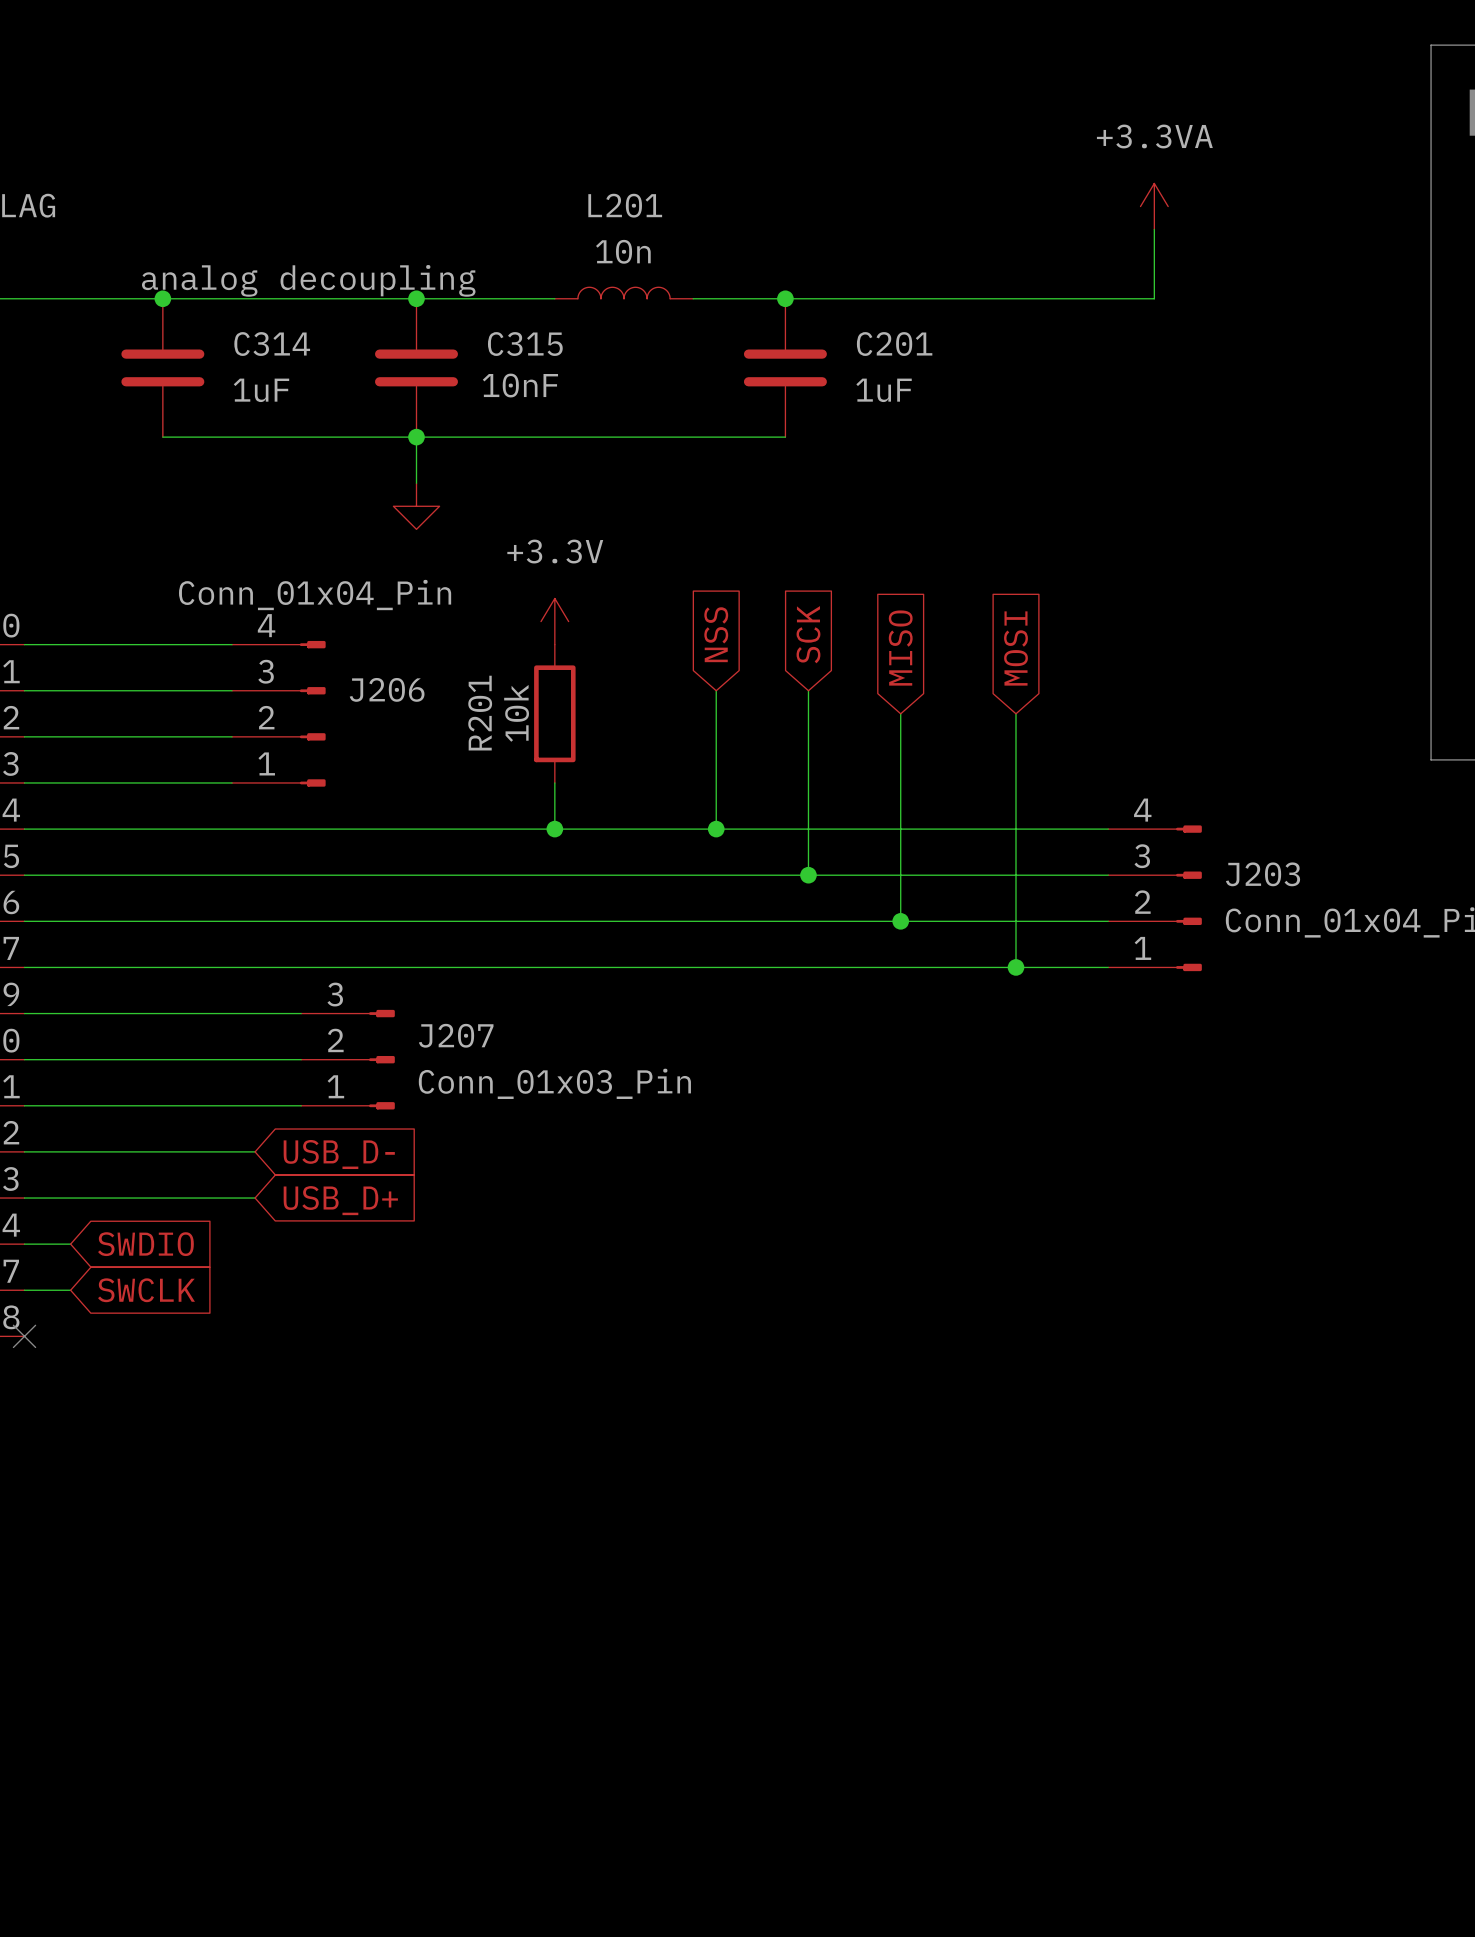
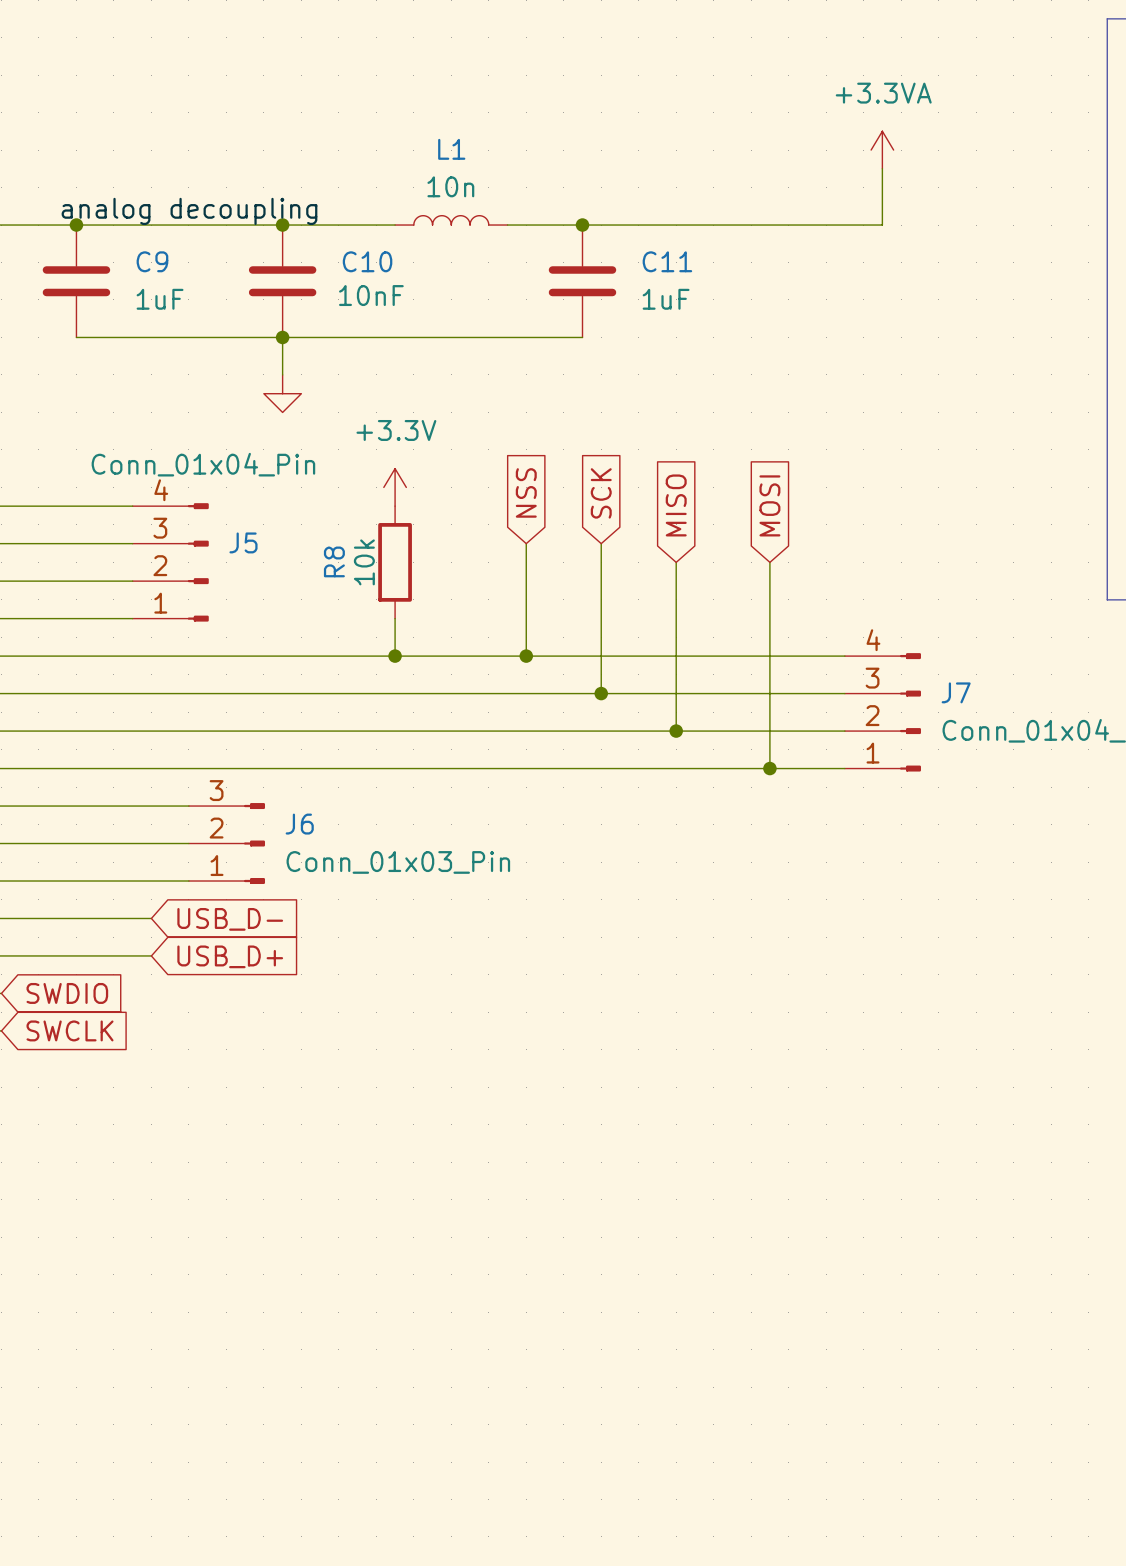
L201 name: L201 (625, 205) -> L1 (451, 149)
C314 name: C314 (272, 344) -> C9 (152, 261)
C315 name: C315 (525, 344) -> C10 (367, 261)
C201 name: C201 (894, 344) -> C11 (667, 261)
J206 name: J206 (387, 689) -> J5 (243, 542)
R201 name: R201 (480, 713) -> R8 (334, 561)
J203 name: J203 (1263, 874) -> J7 (956, 692)
J207 name: J207 (456, 1035) -> J6 (299, 824)

